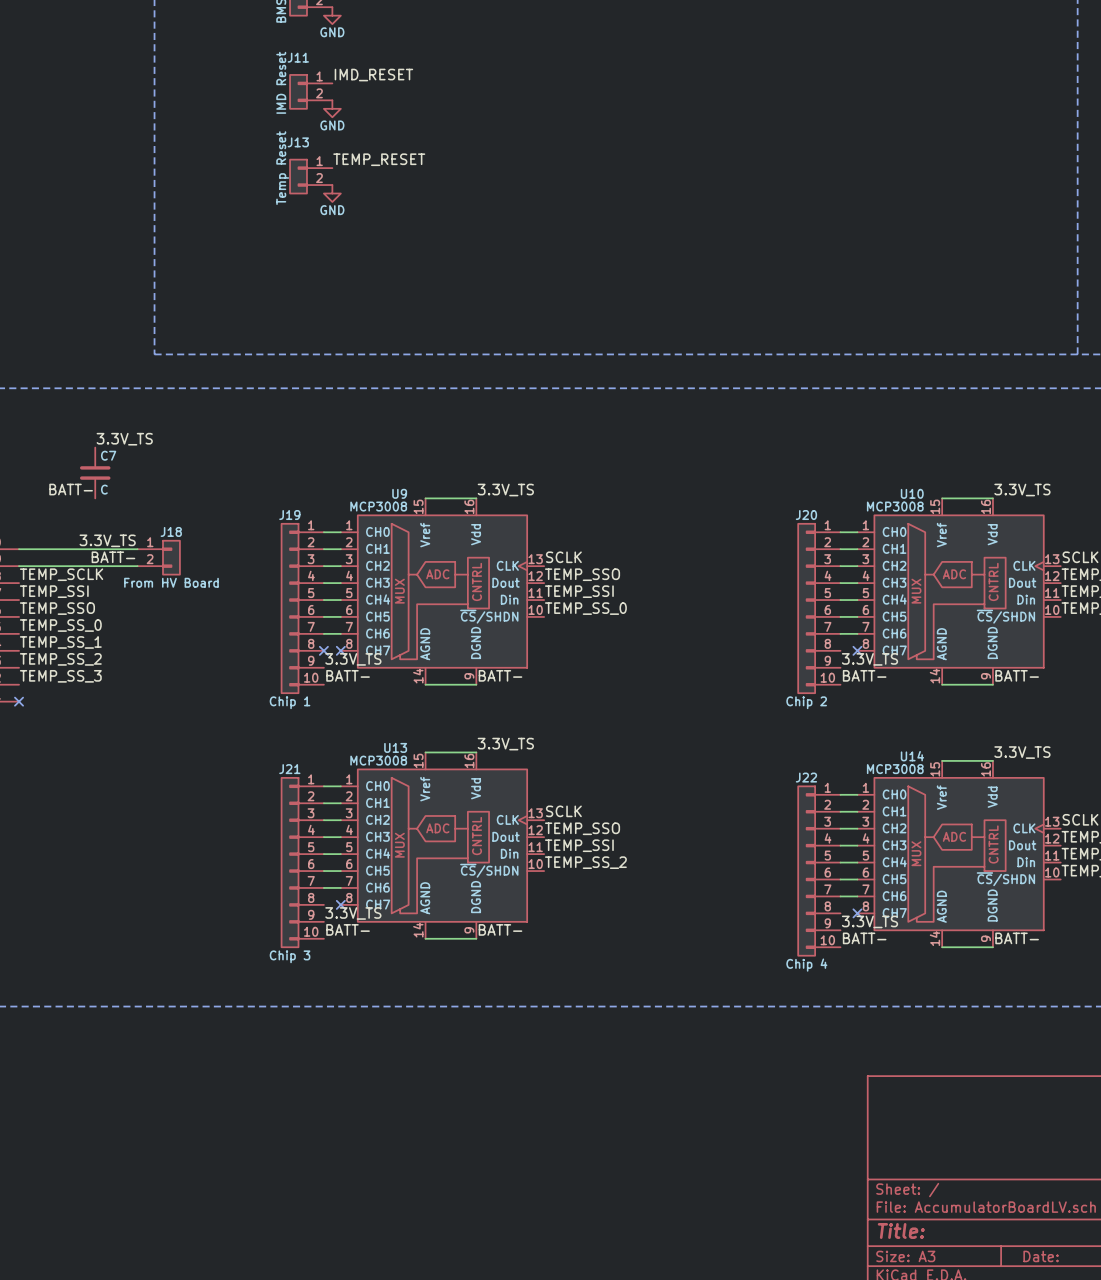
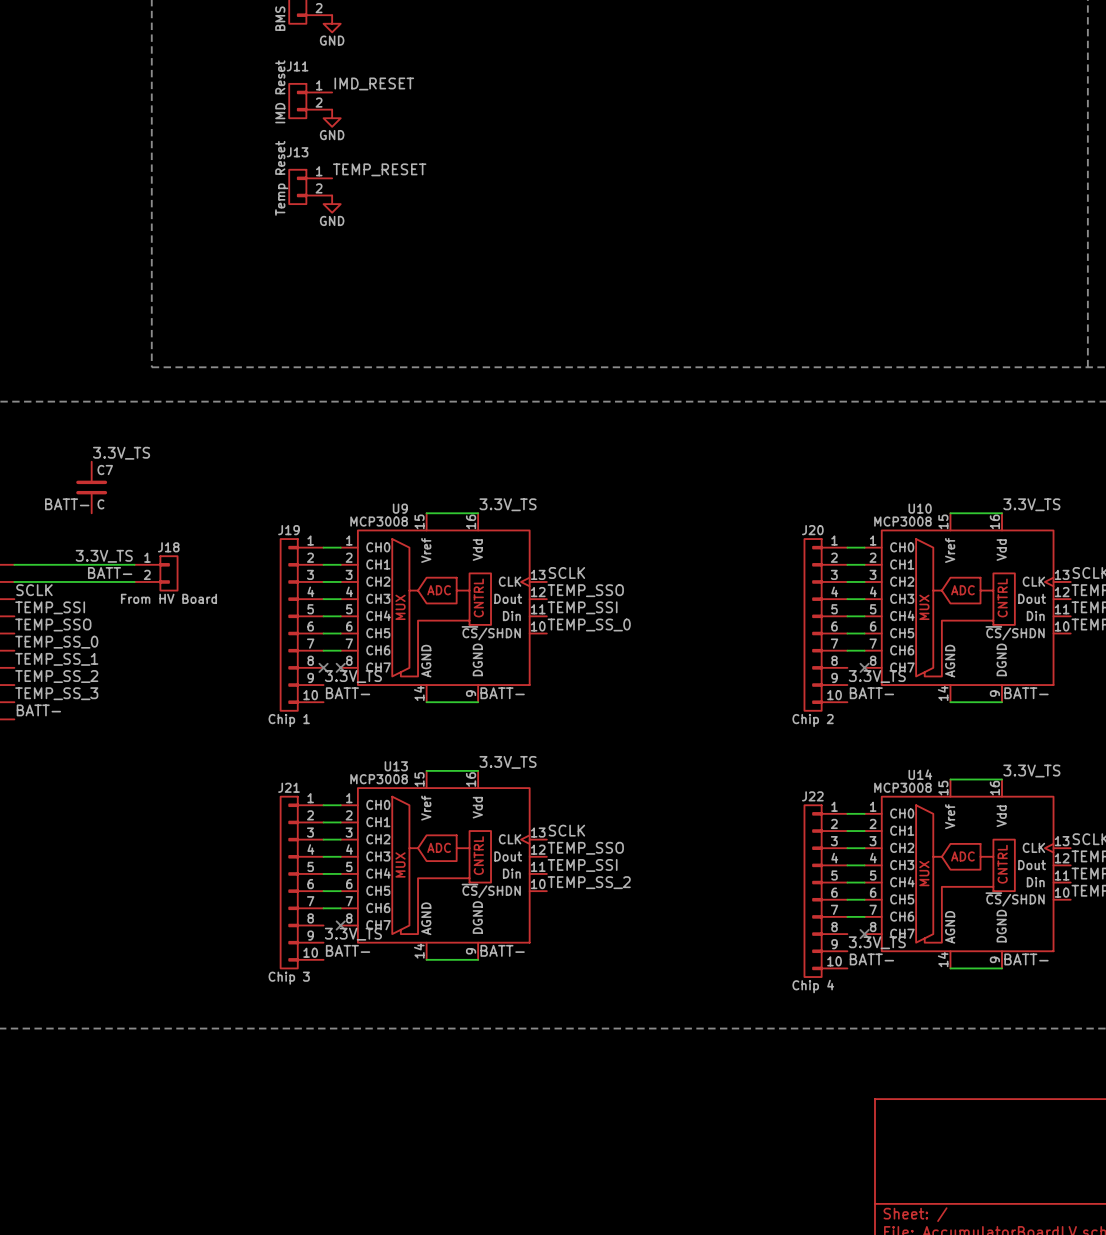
label: TEMP_SCLK (61, 574) -> SCLK (34, 590)
label: none -> BATT- (38, 710)
no-connect mark: (19, 701) -> none

